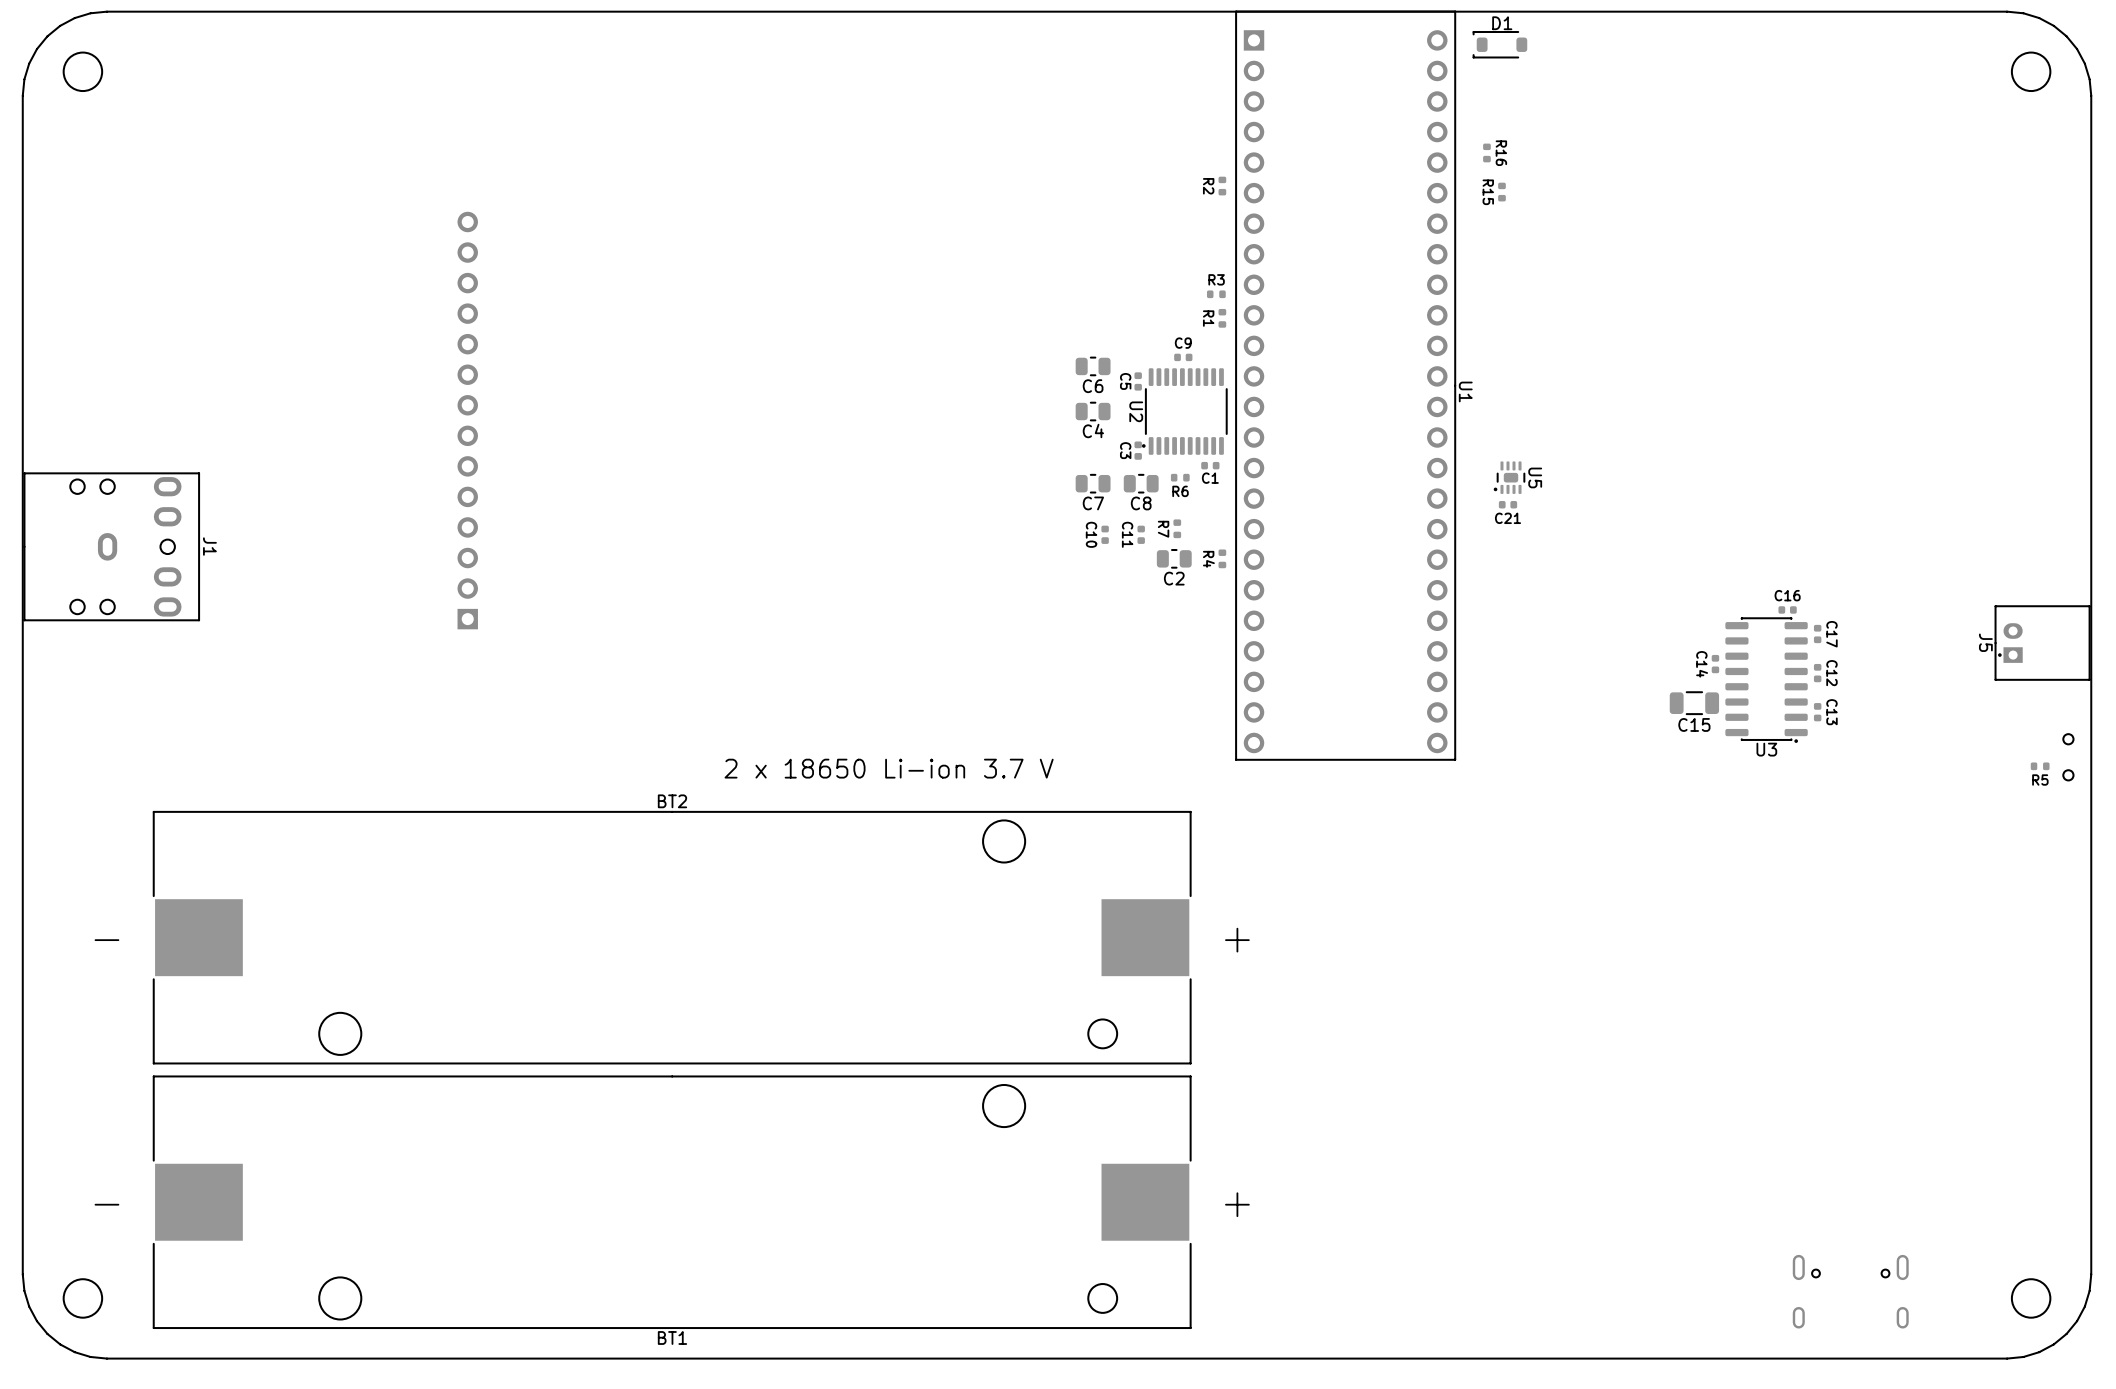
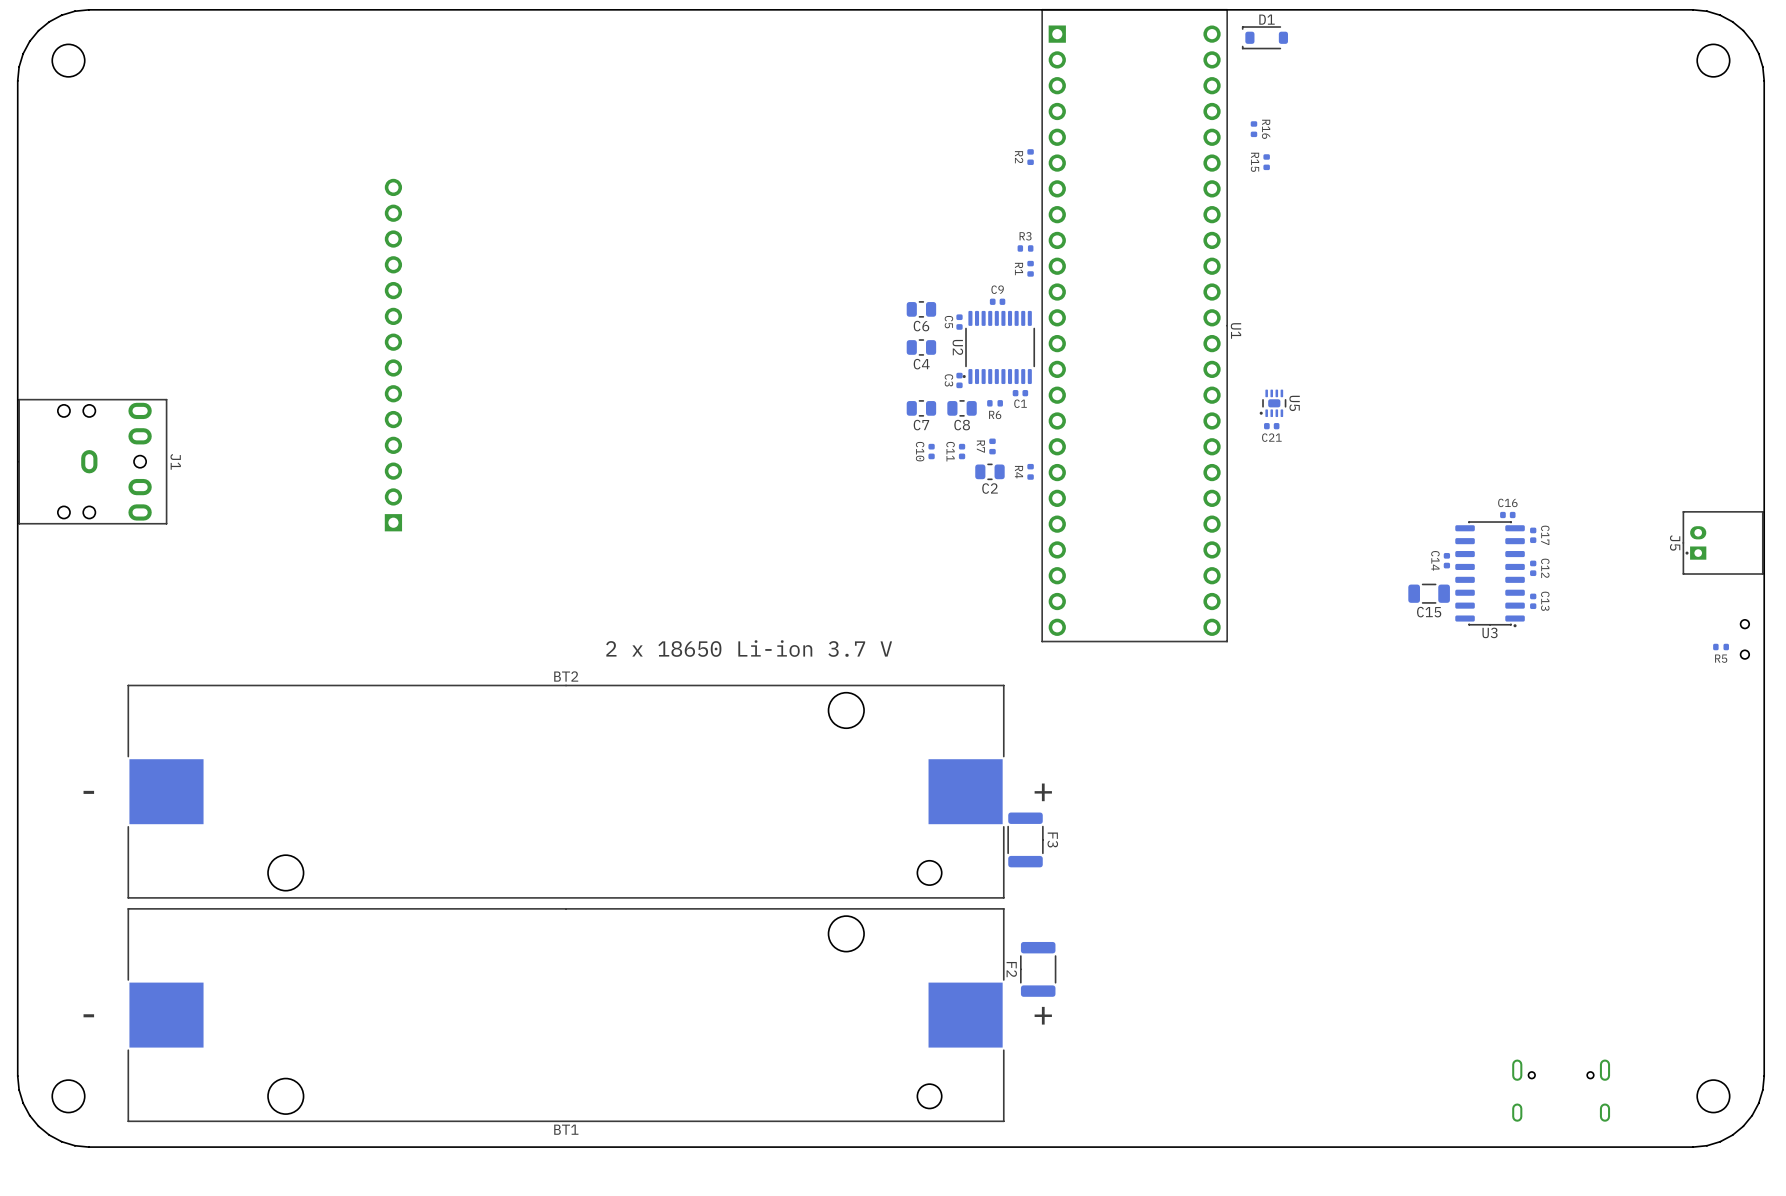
F3: none -> (1025, 839)
F2: none -> (1038, 969)

